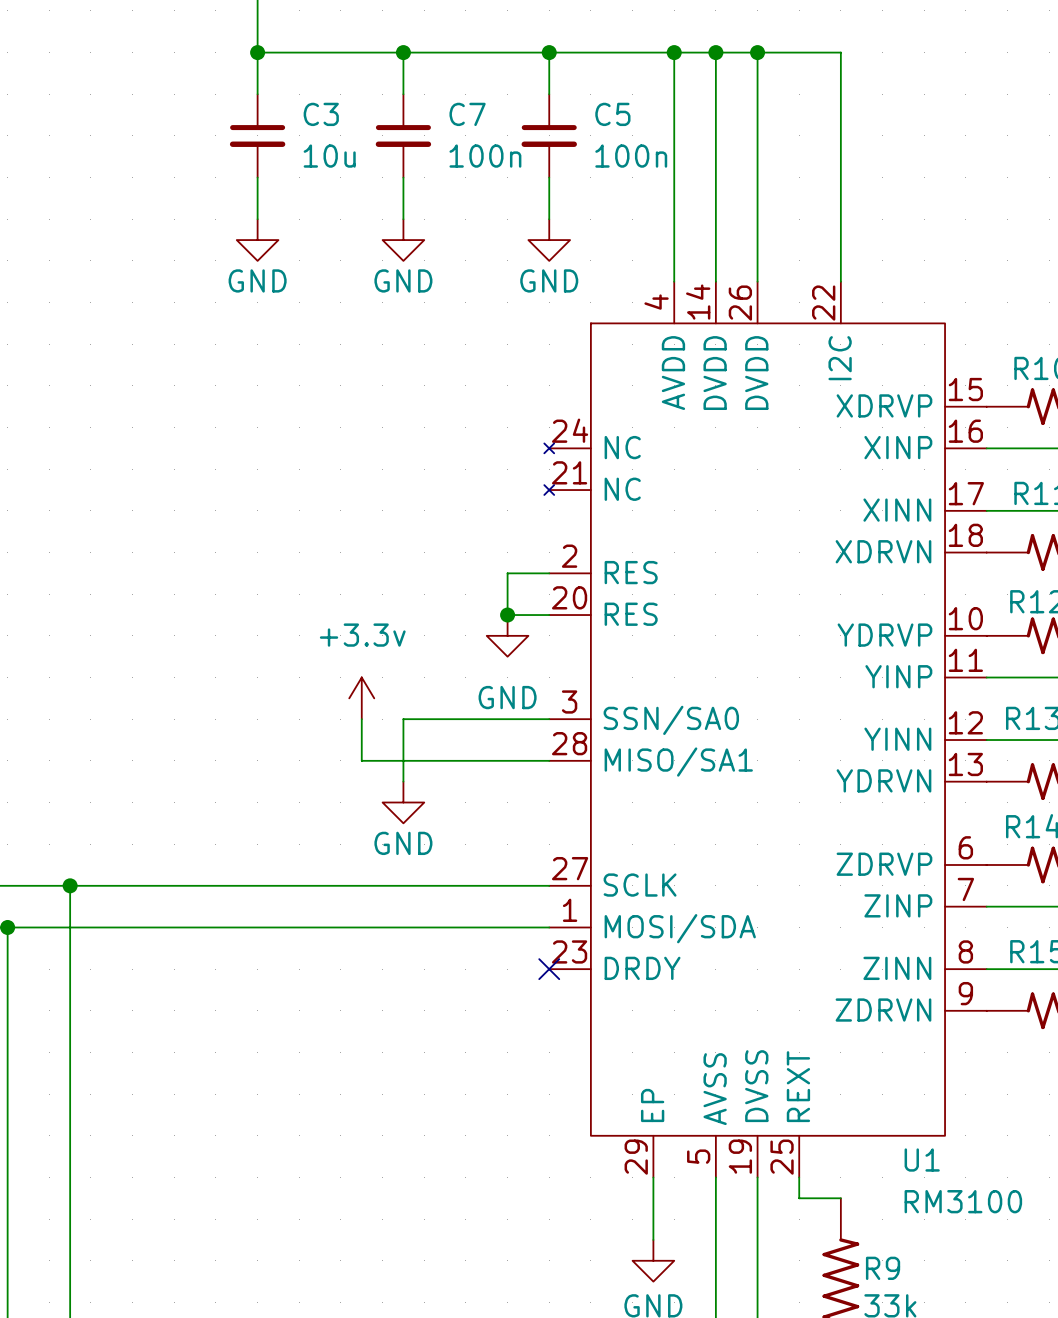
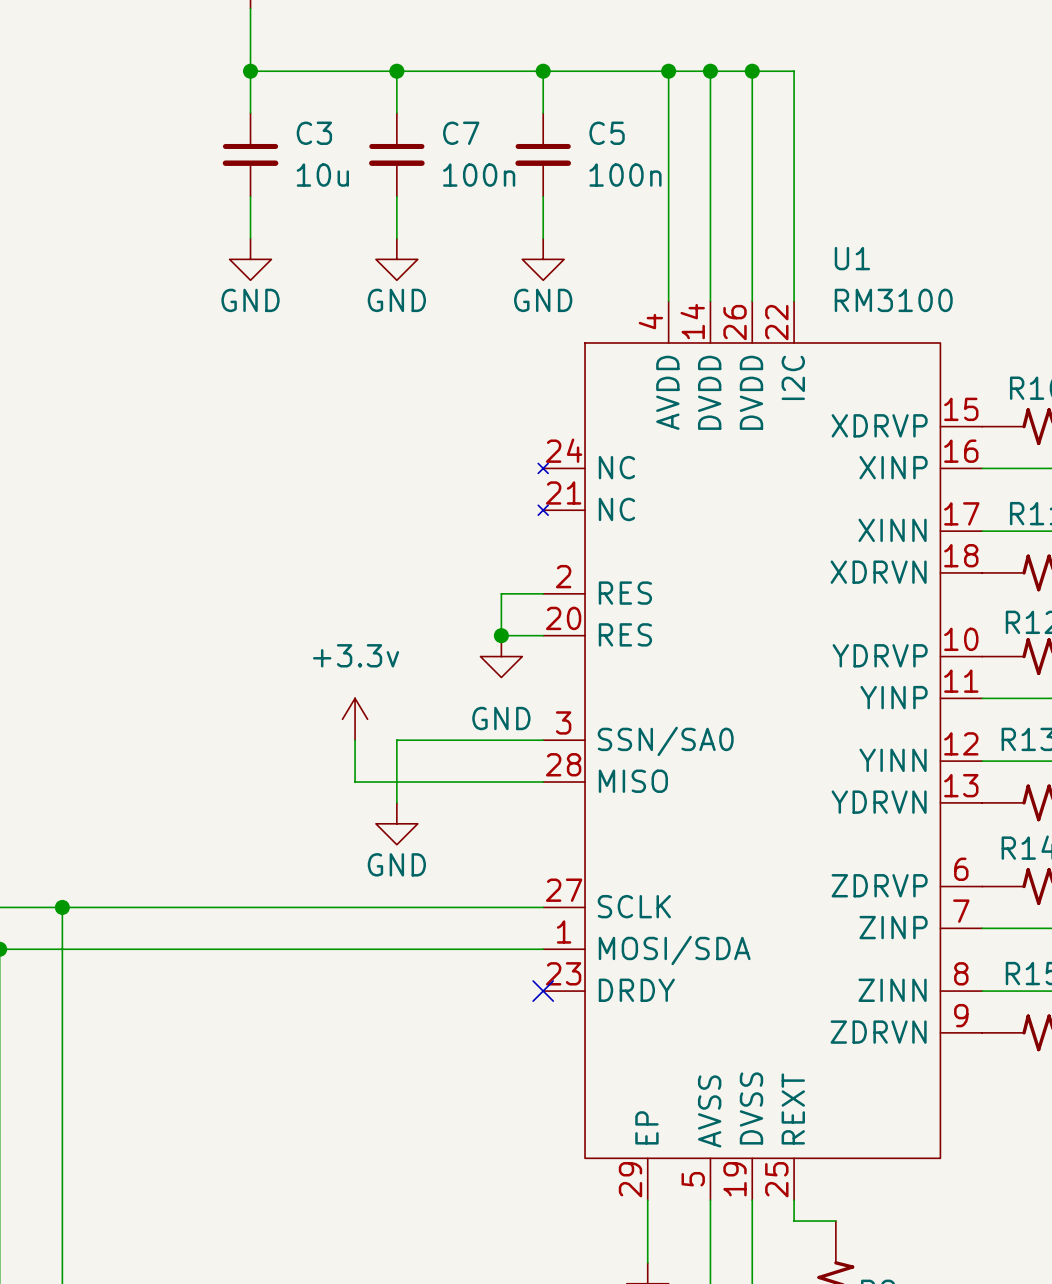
wire: (799, 52) (840, 52) (840, 281) -> (794, 71) (794, 301)
U1 symbol: [544, 281, 987, 1178] -> [538, 301, 983, 1201]
U1 name position: U1 (922, 1160) -> U1 (852, 258)
U1 value position: RM3100 (963, 1201) -> RM3100 (893, 300)

